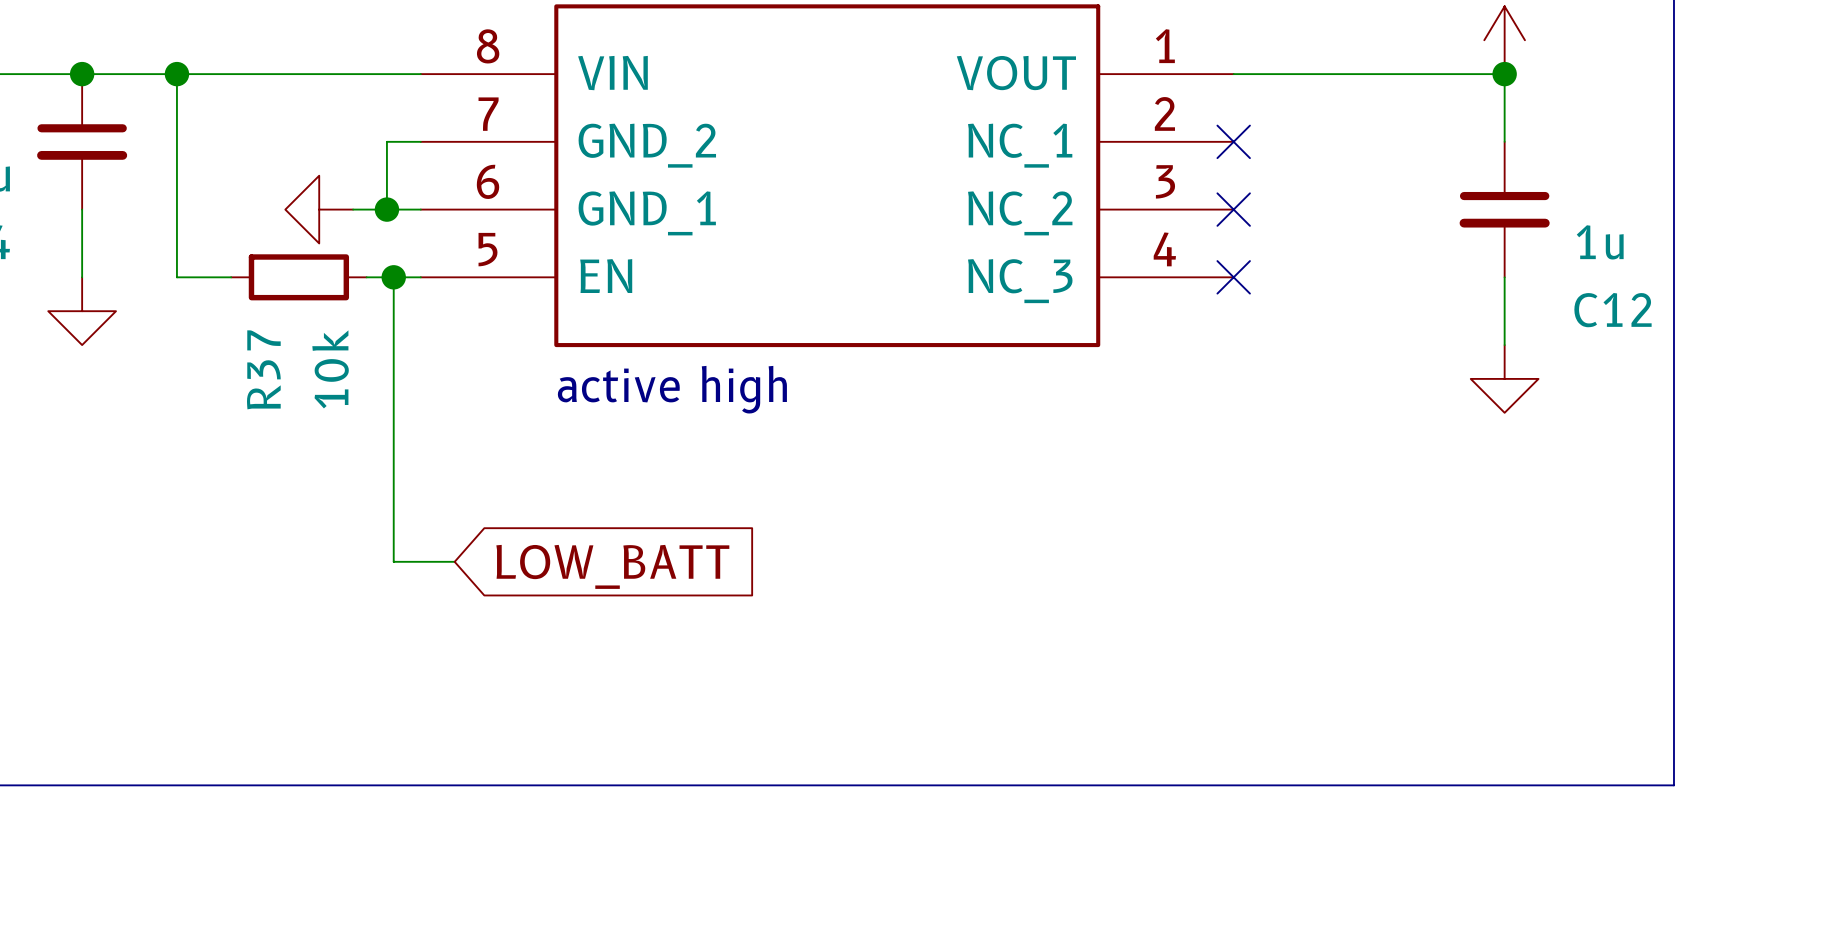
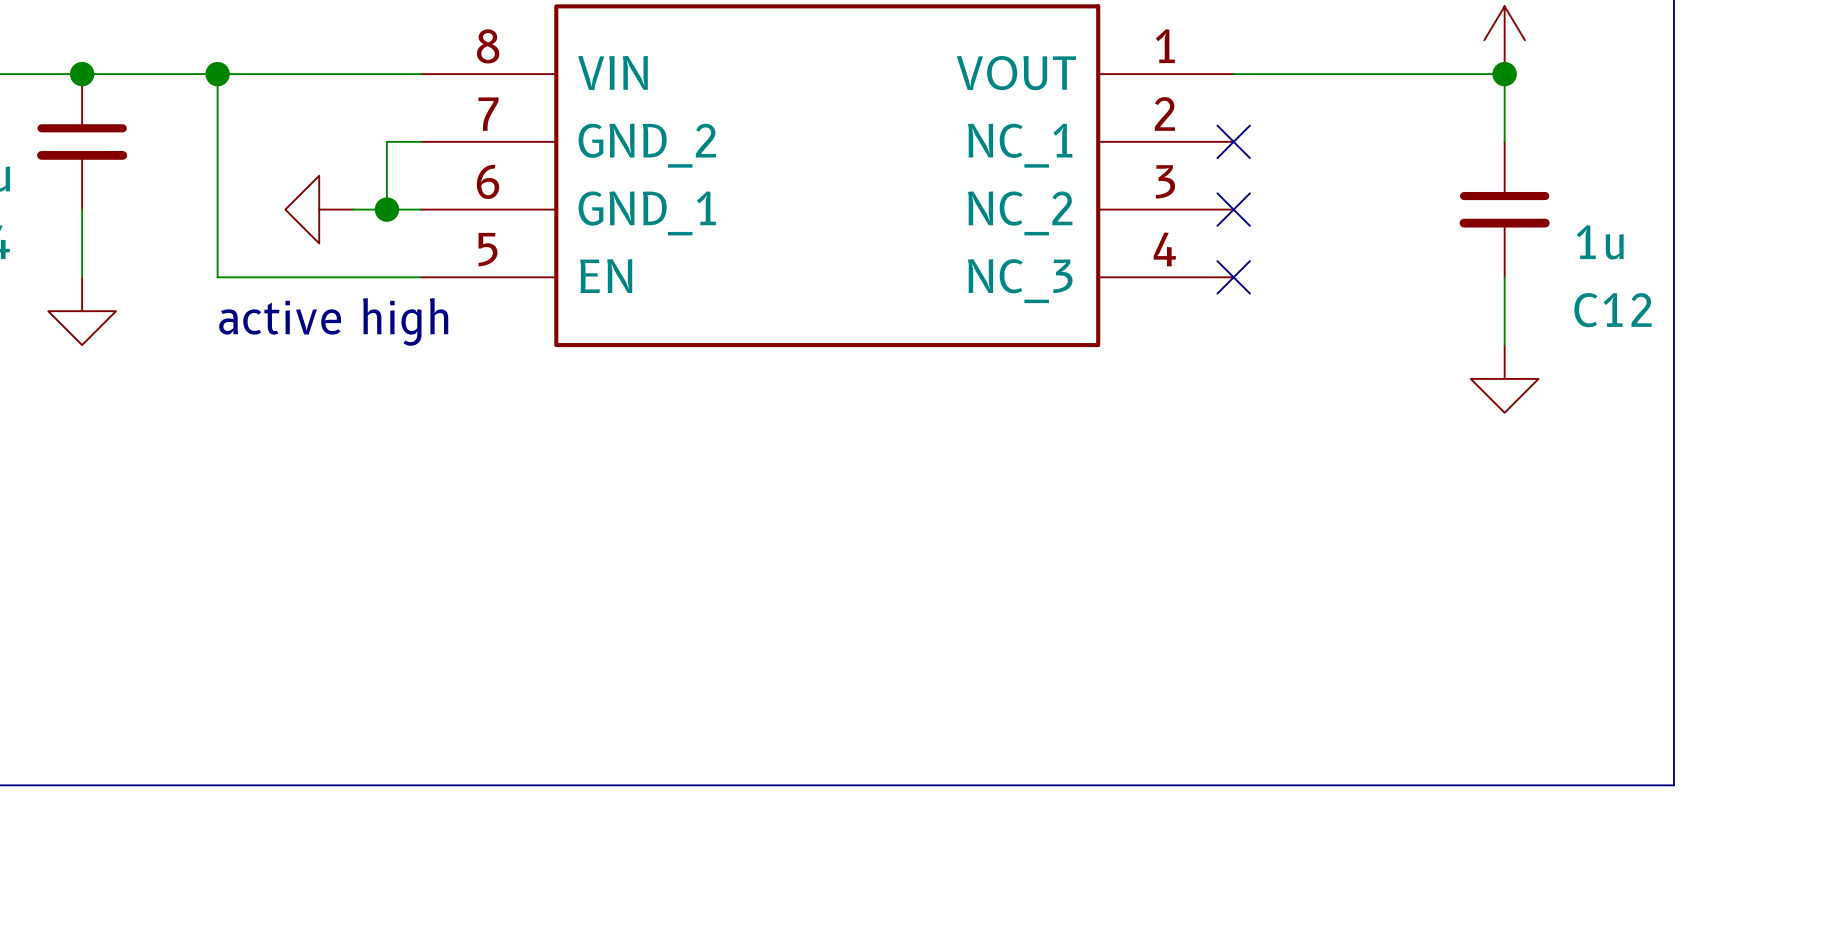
wire: (176, 74) (176, 277) (217, 277) -> (217, 74) (217, 277)
junction position: (176, 74) -> (217, 74)
wire: none -> (231, 277) (366, 277)
R37: 10k (298, 277) -> none
wire: (393, 277) (393, 561) (454, 561) -> none
junction: (393, 277) -> none
text position: active high (672, 389) -> active high (333, 321)
global label: LOW_BATT (612, 566) -> none

